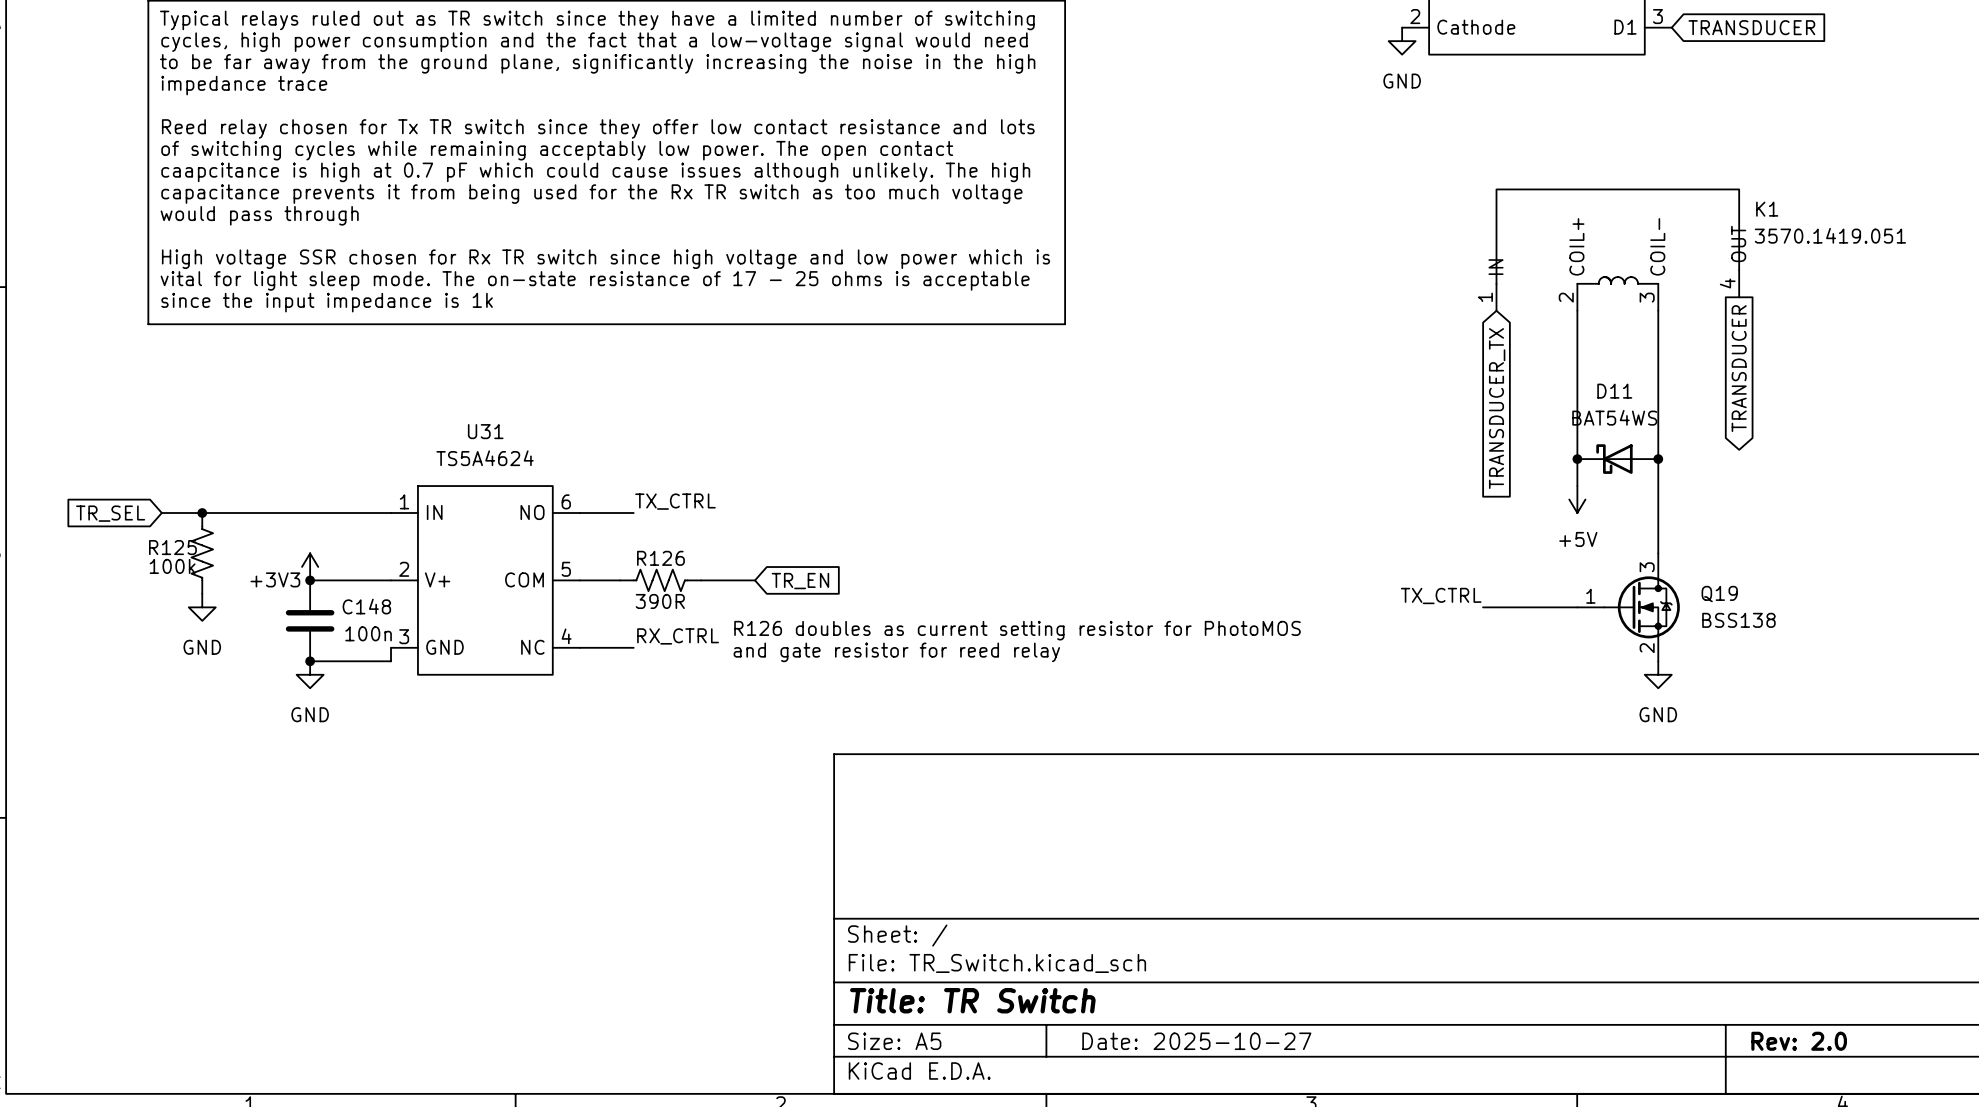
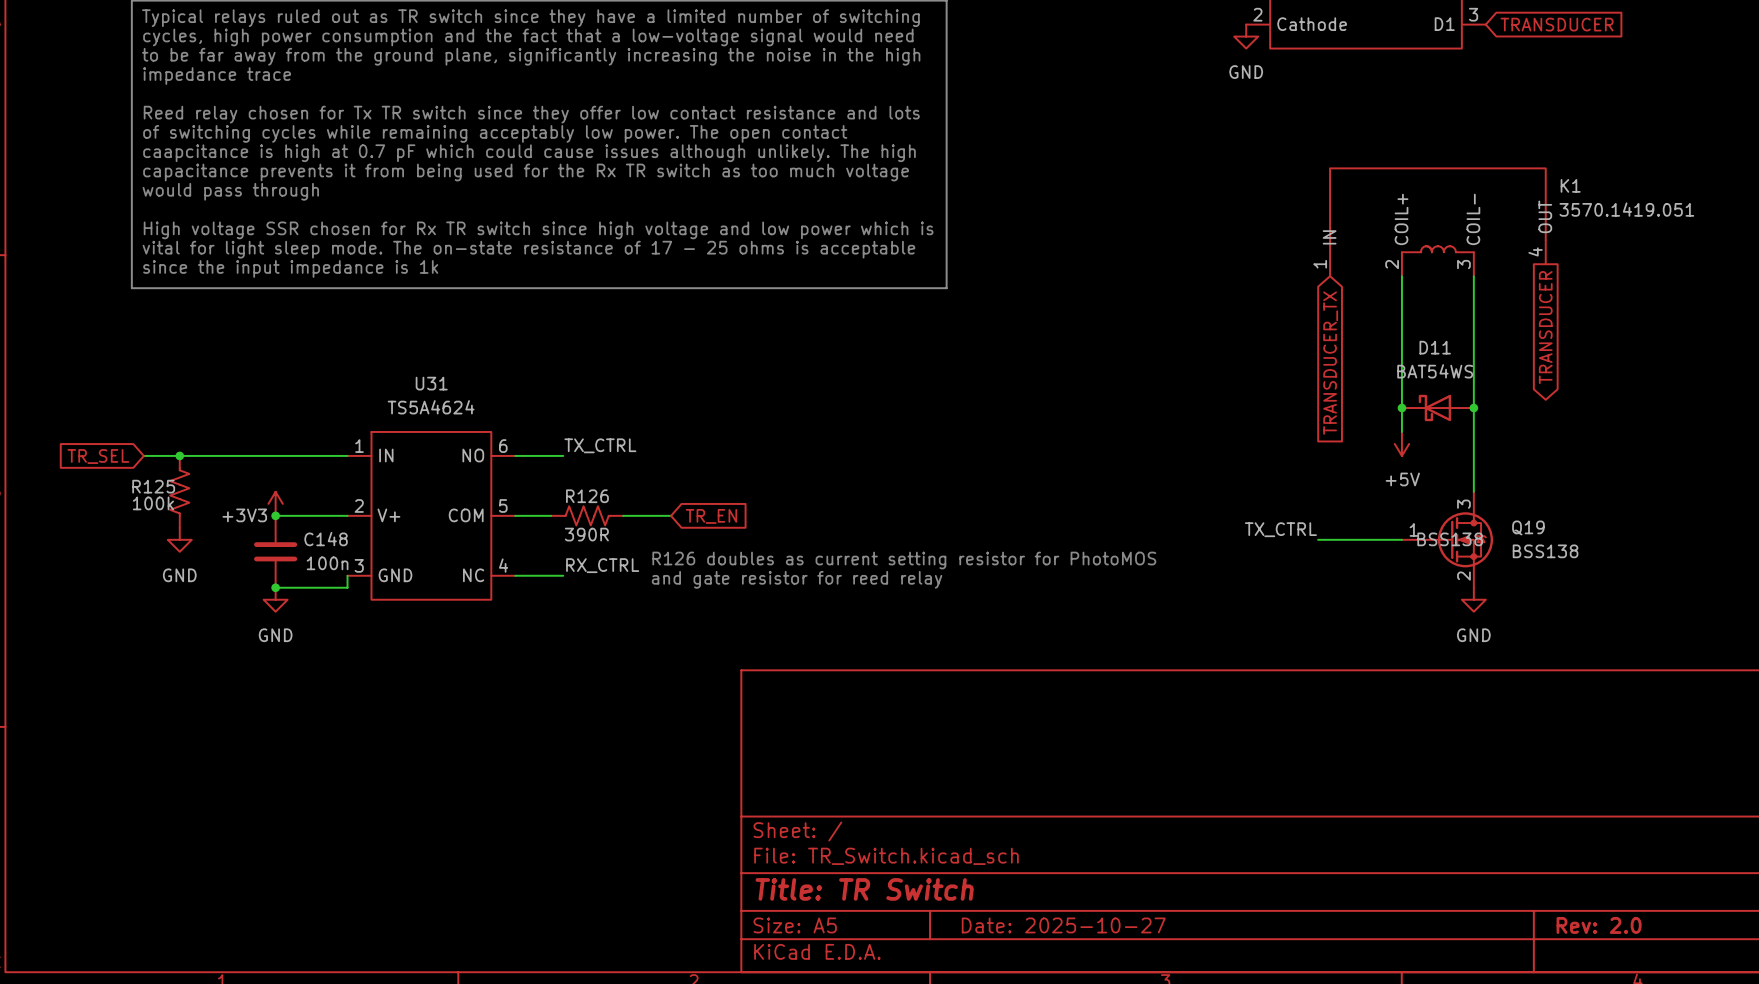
Q19 text: none -> BSS138 (1450, 539)

